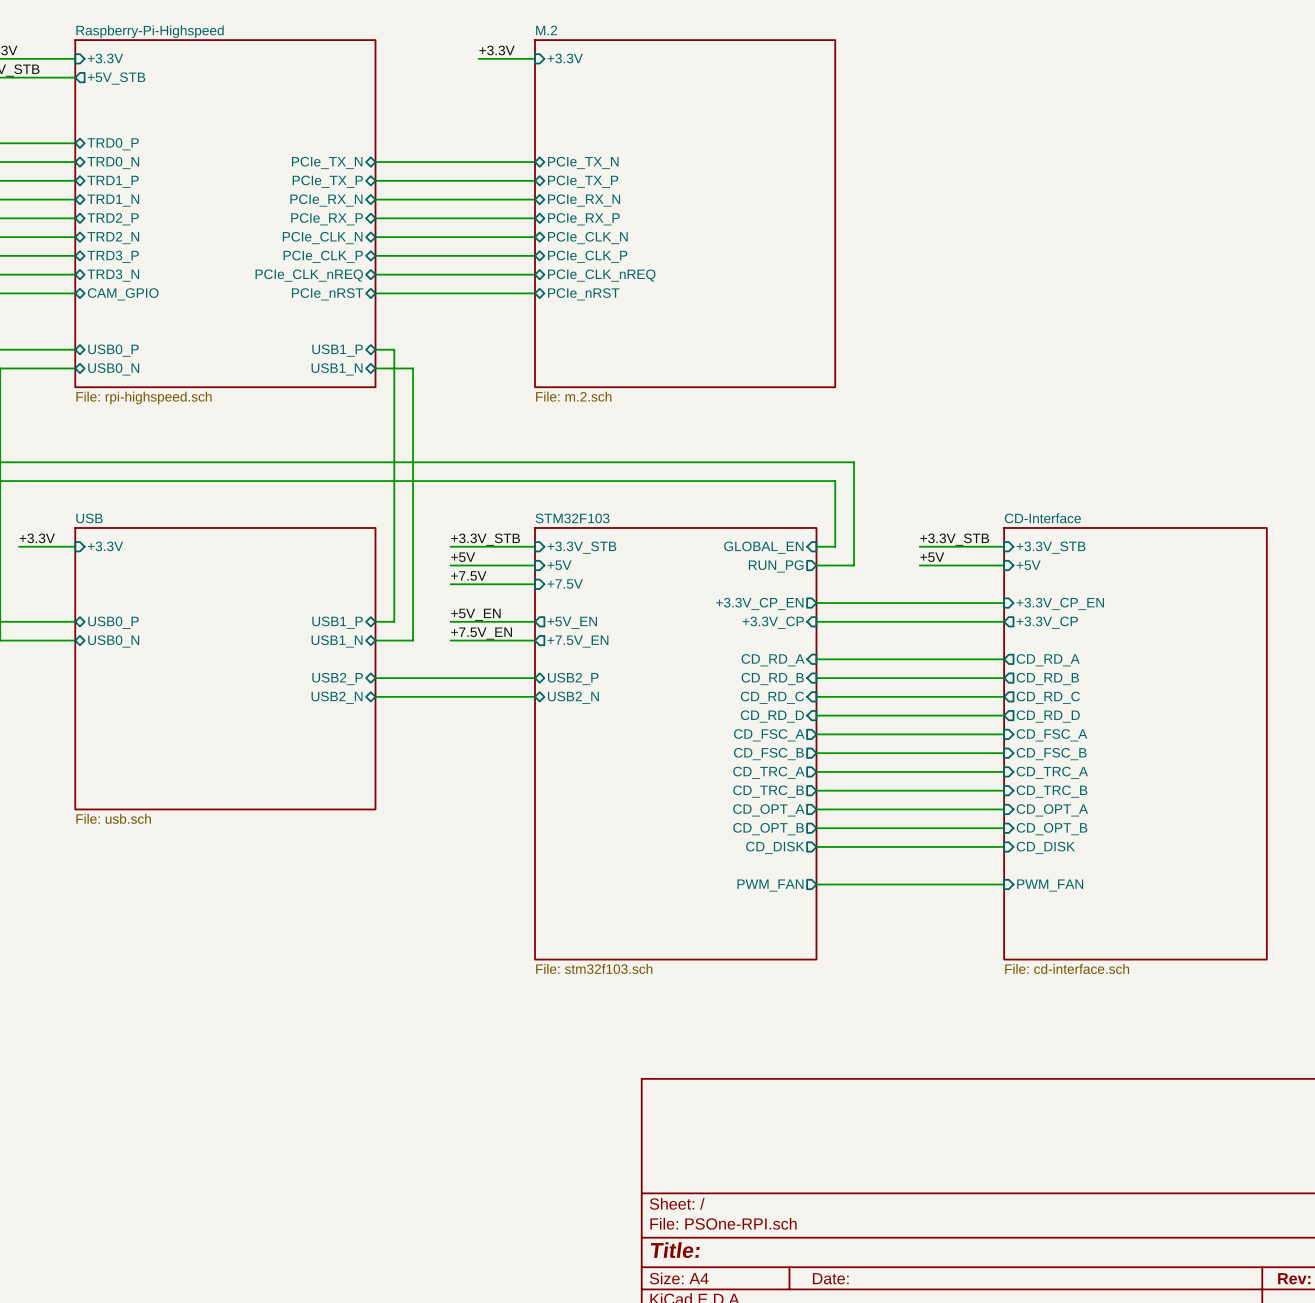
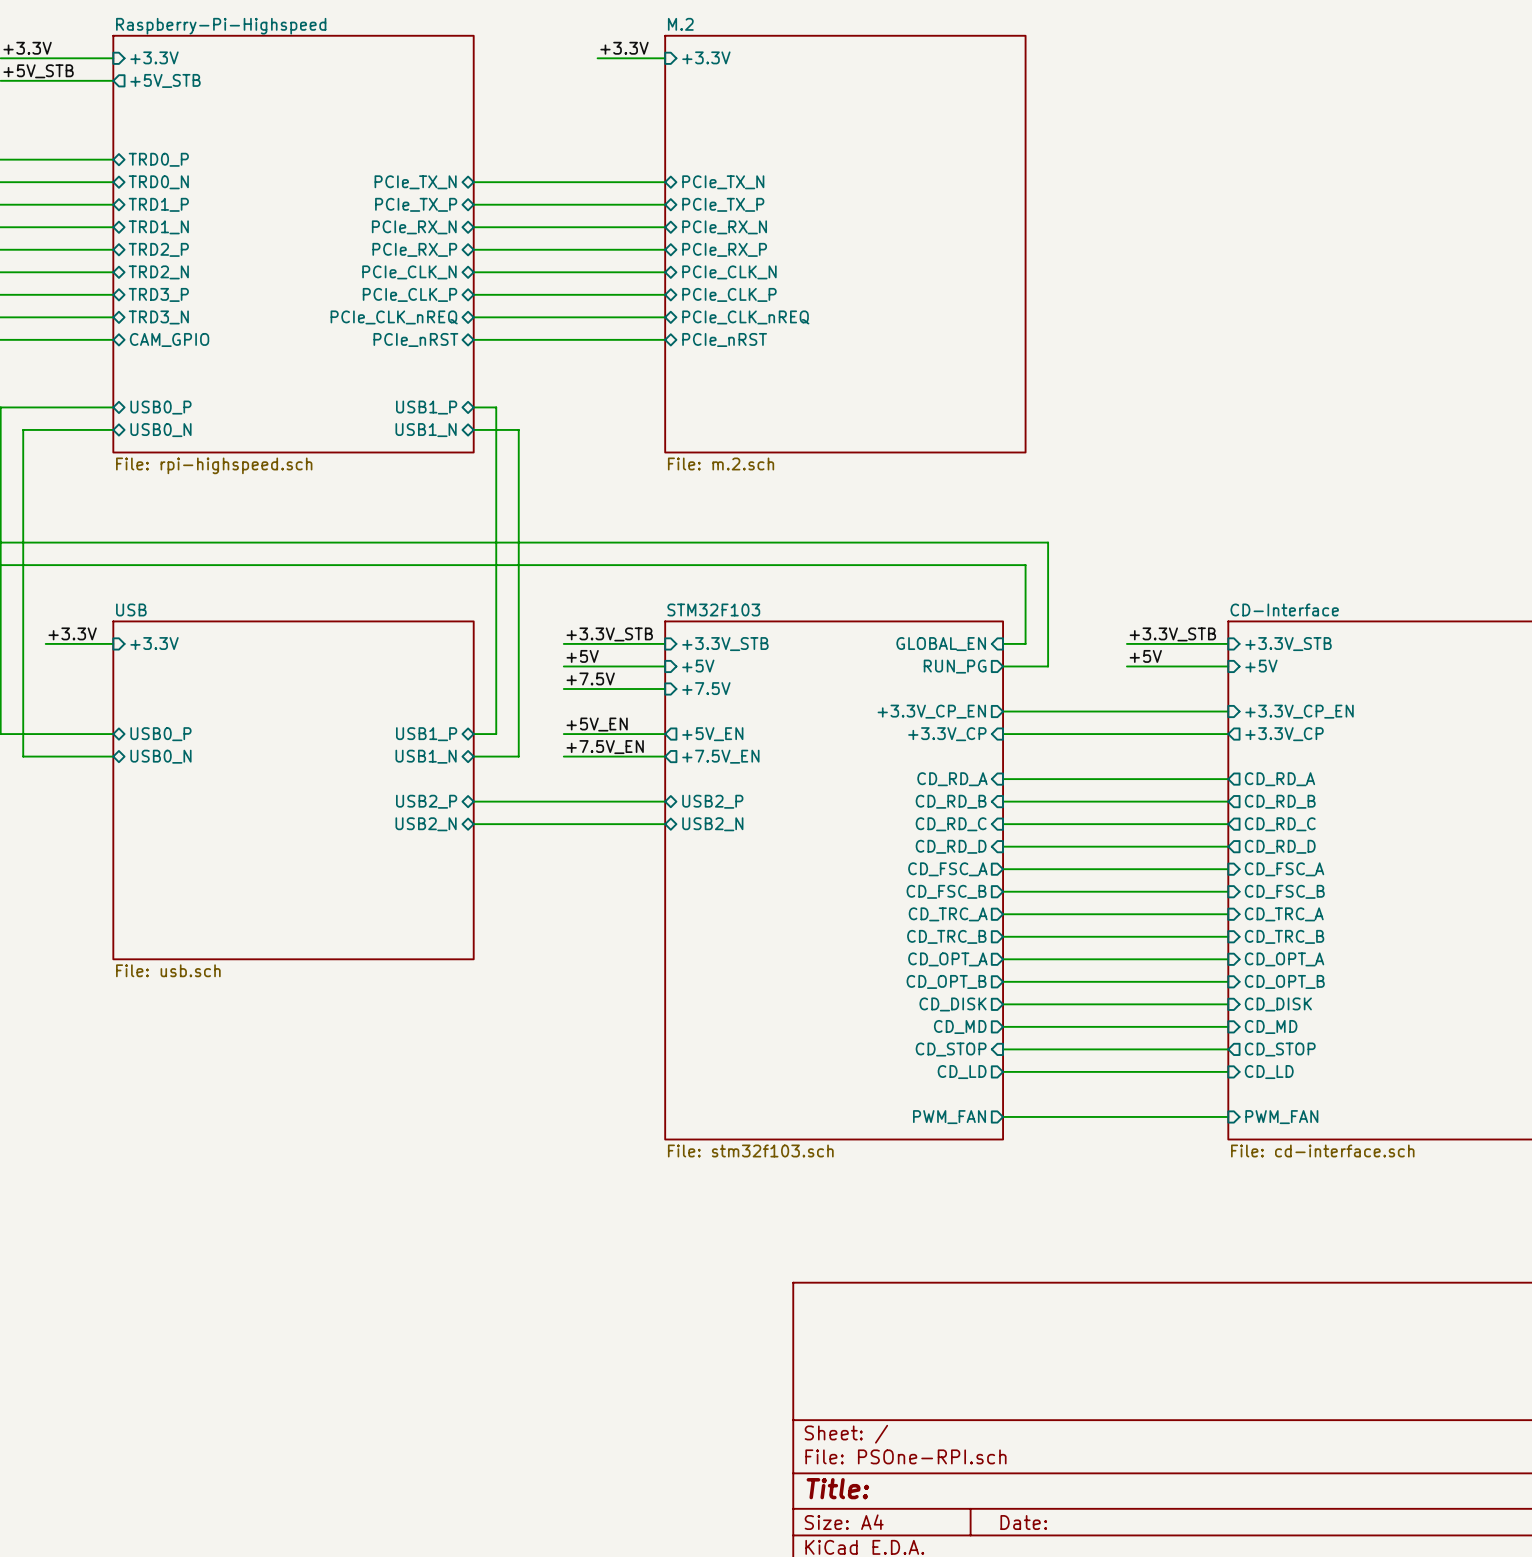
wire: none -> (1003, 1026) (1228, 1026)
sheet pin: none -> CD_MD (960, 1026)
sheet pin: none -> CD_MD (1271, 1026)
sheet pin shape: output (770, 885) -> input (951, 1049)
sheet pin: PWM_FAN (770, 885) -> CD_STOP (951, 1049)
sheet pin shape: input (1050, 885) -> output (1280, 1049)
sheet pin: PWM_FAN (1050, 885) -> CD_STOP (1280, 1049)
wire: none -> (1003, 1071) (1228, 1071)
sheet pin: none -> CD_LD (962, 1072)
sheet pin: none -> CD_LD (1269, 1072)
wire: none -> (1003, 1116) (1228, 1116)
sheet pin: none -> PWM_FAN (949, 1117)
sheet pin: none -> PWM_FAN (1281, 1117)

